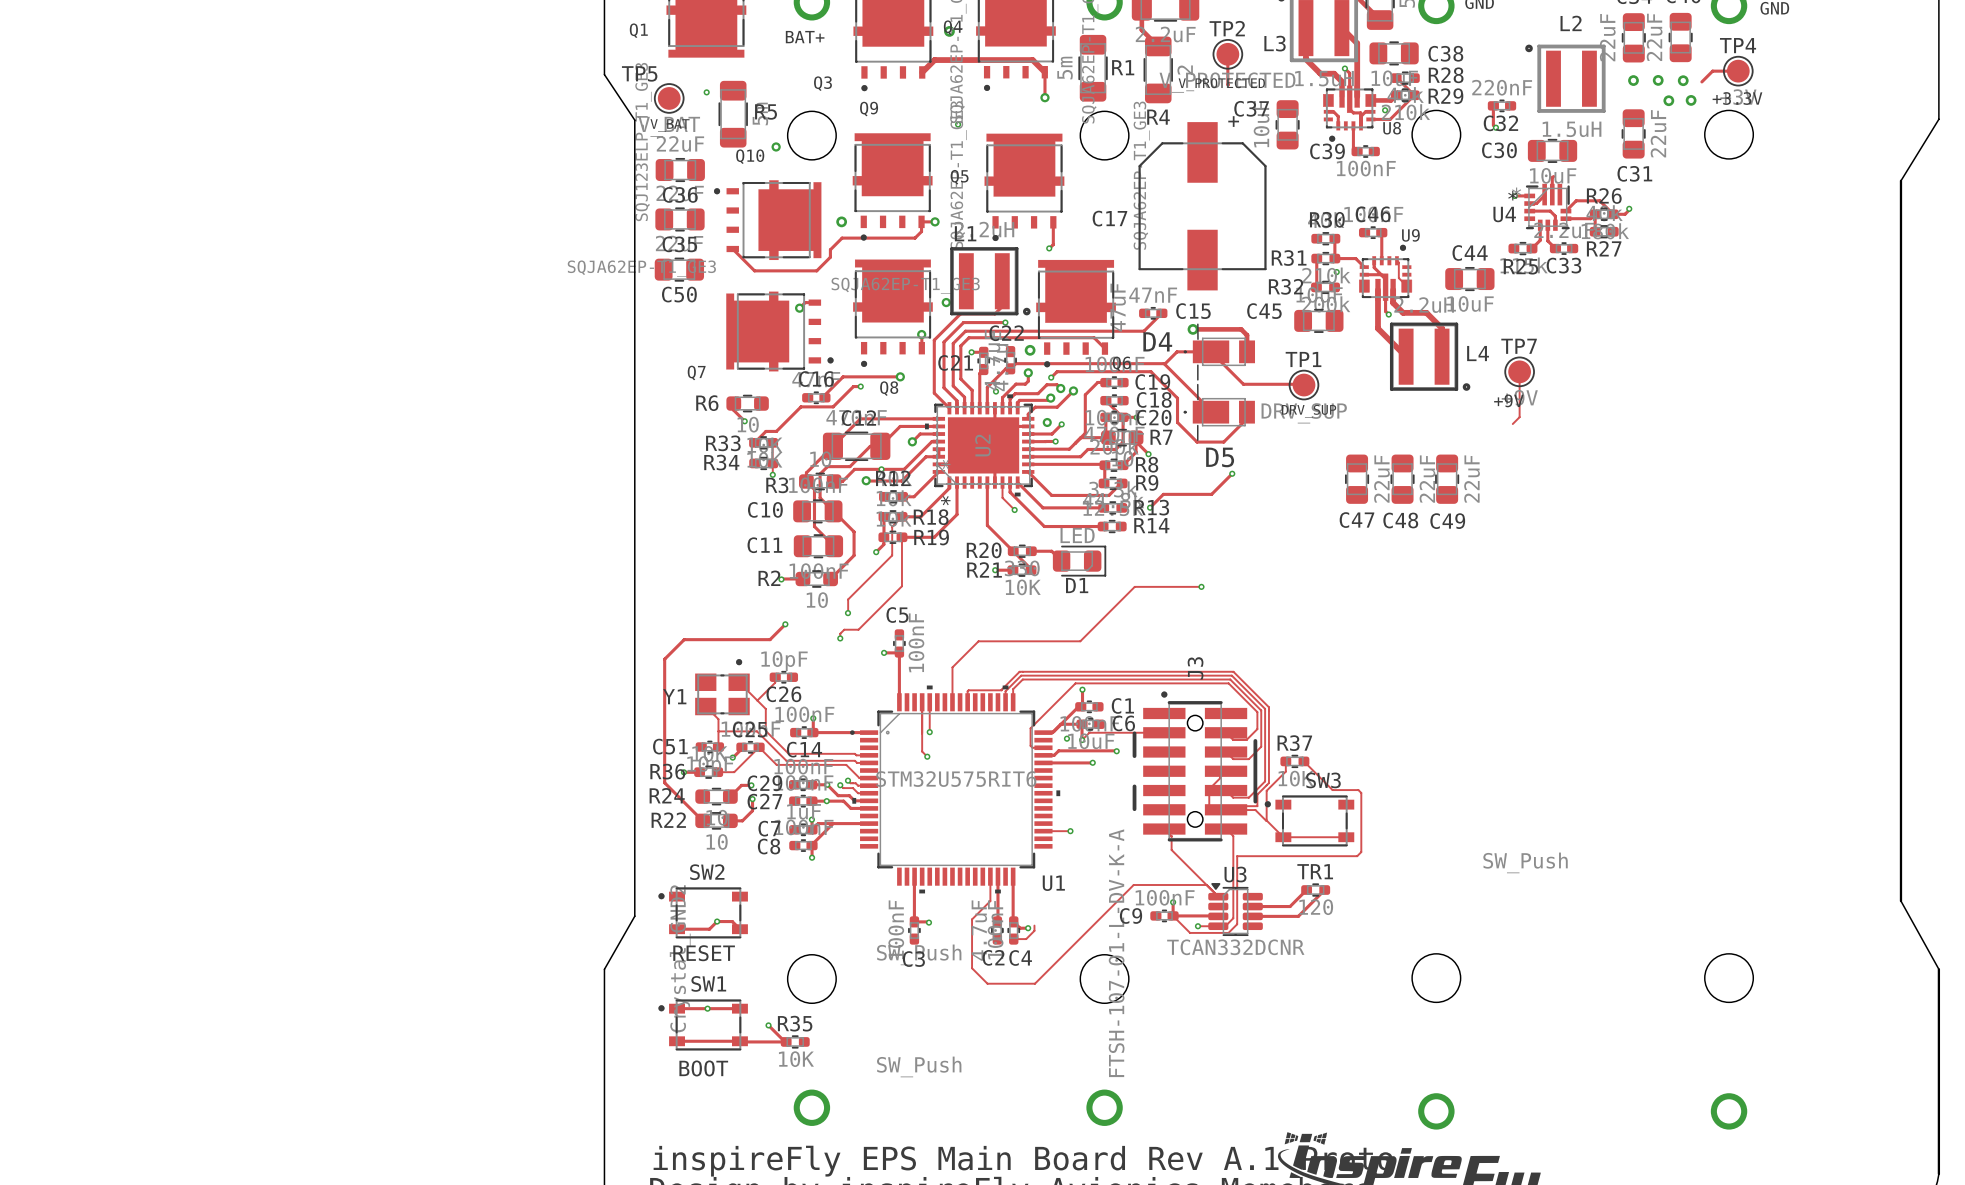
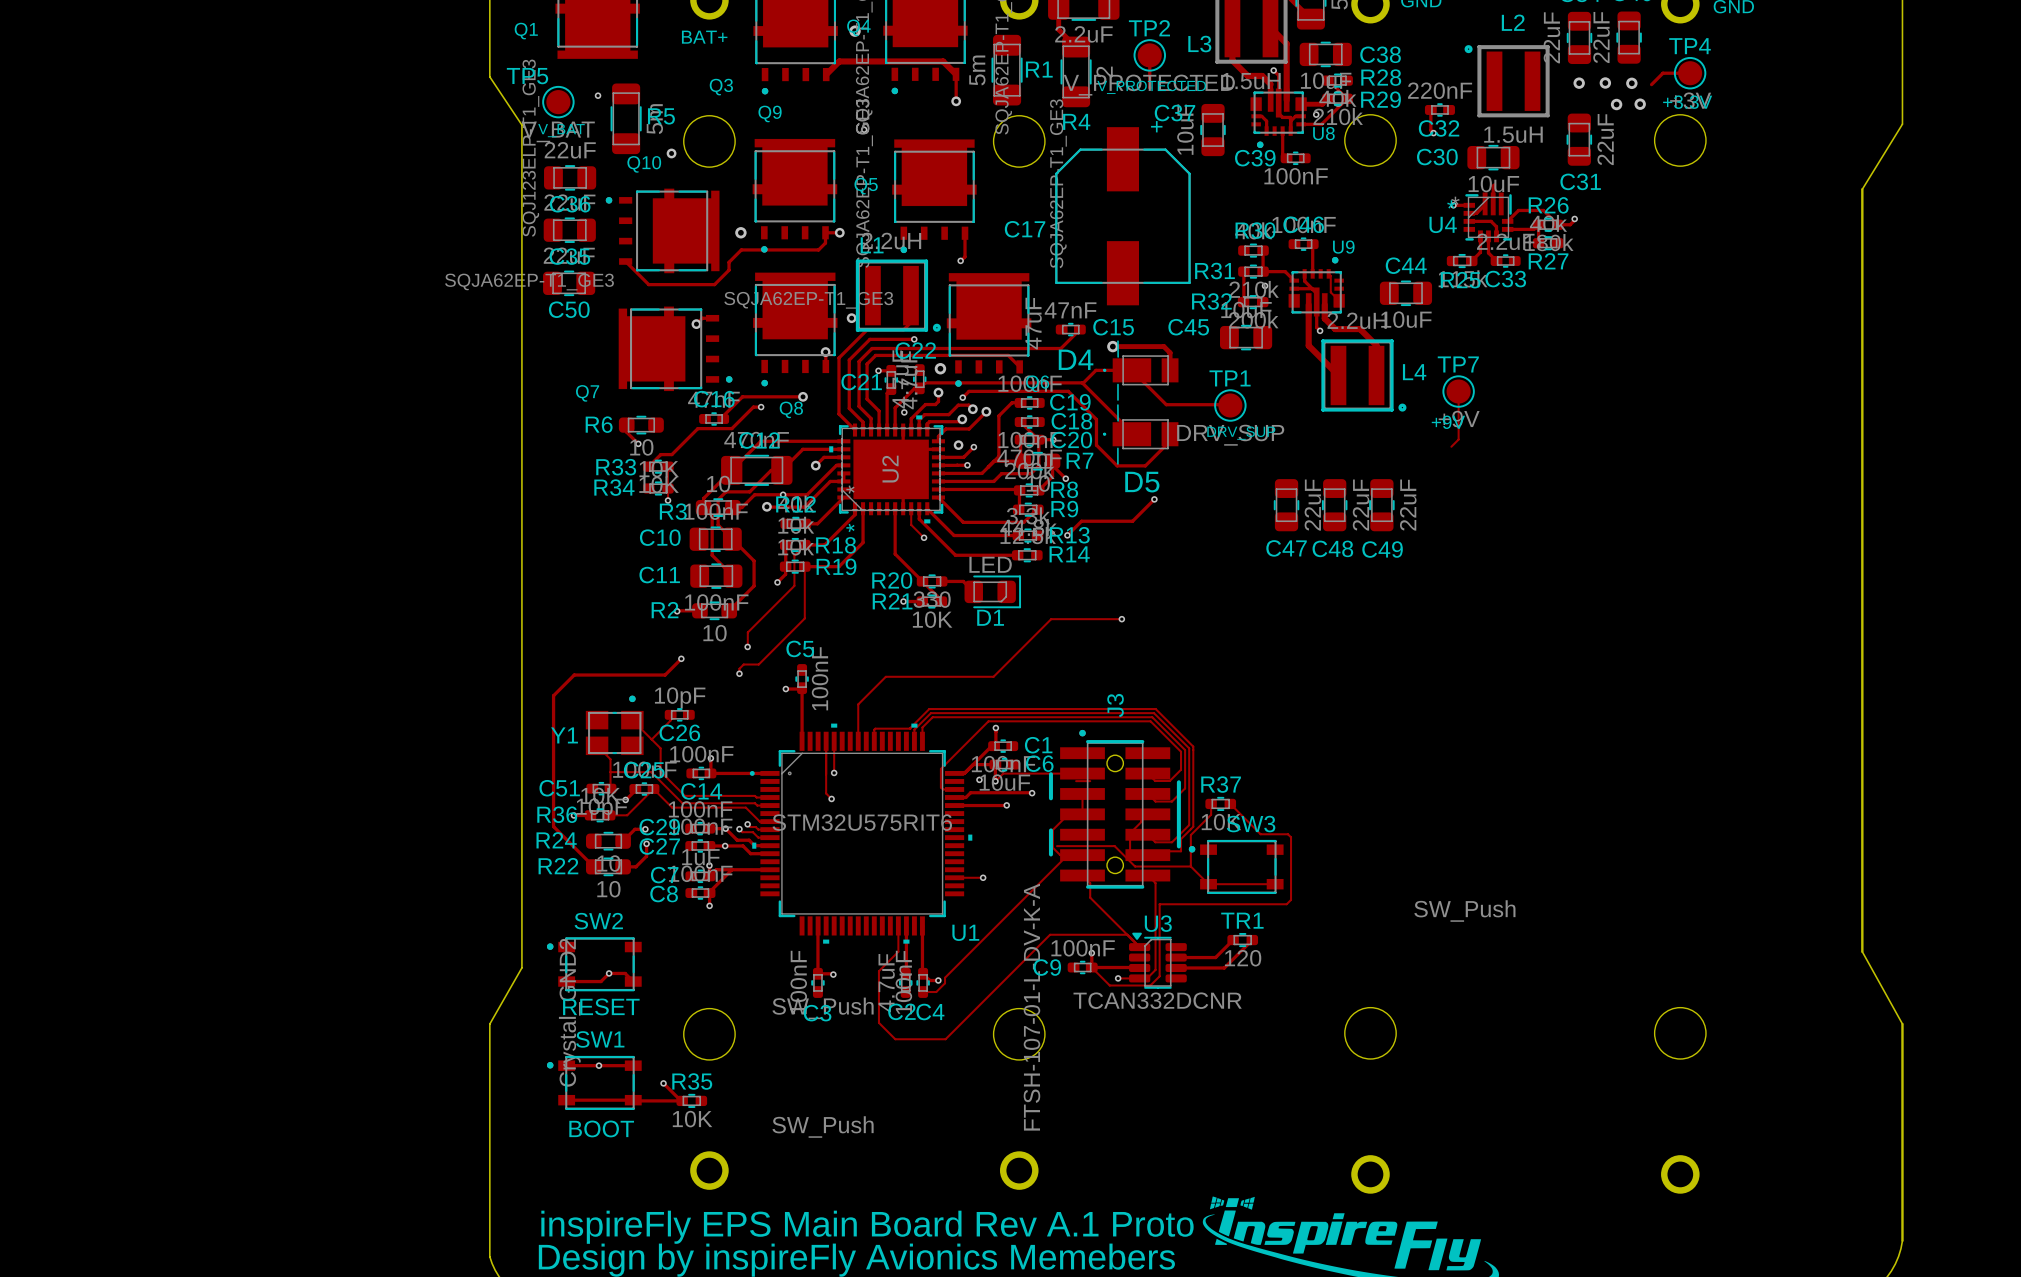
track: none -> (1076, 781) (1090, 781)
track: none -> (1082, 793) (1082, 814)
track: none -> (1068, 814) (1052, 829) (1052, 847) (1060, 855) (1067, 855) (945, 977)
track: (1226, 810) (1255, 810) (1265, 820) -> (1057, 846) (1114, 846) (1135, 866) (1190, 866)

